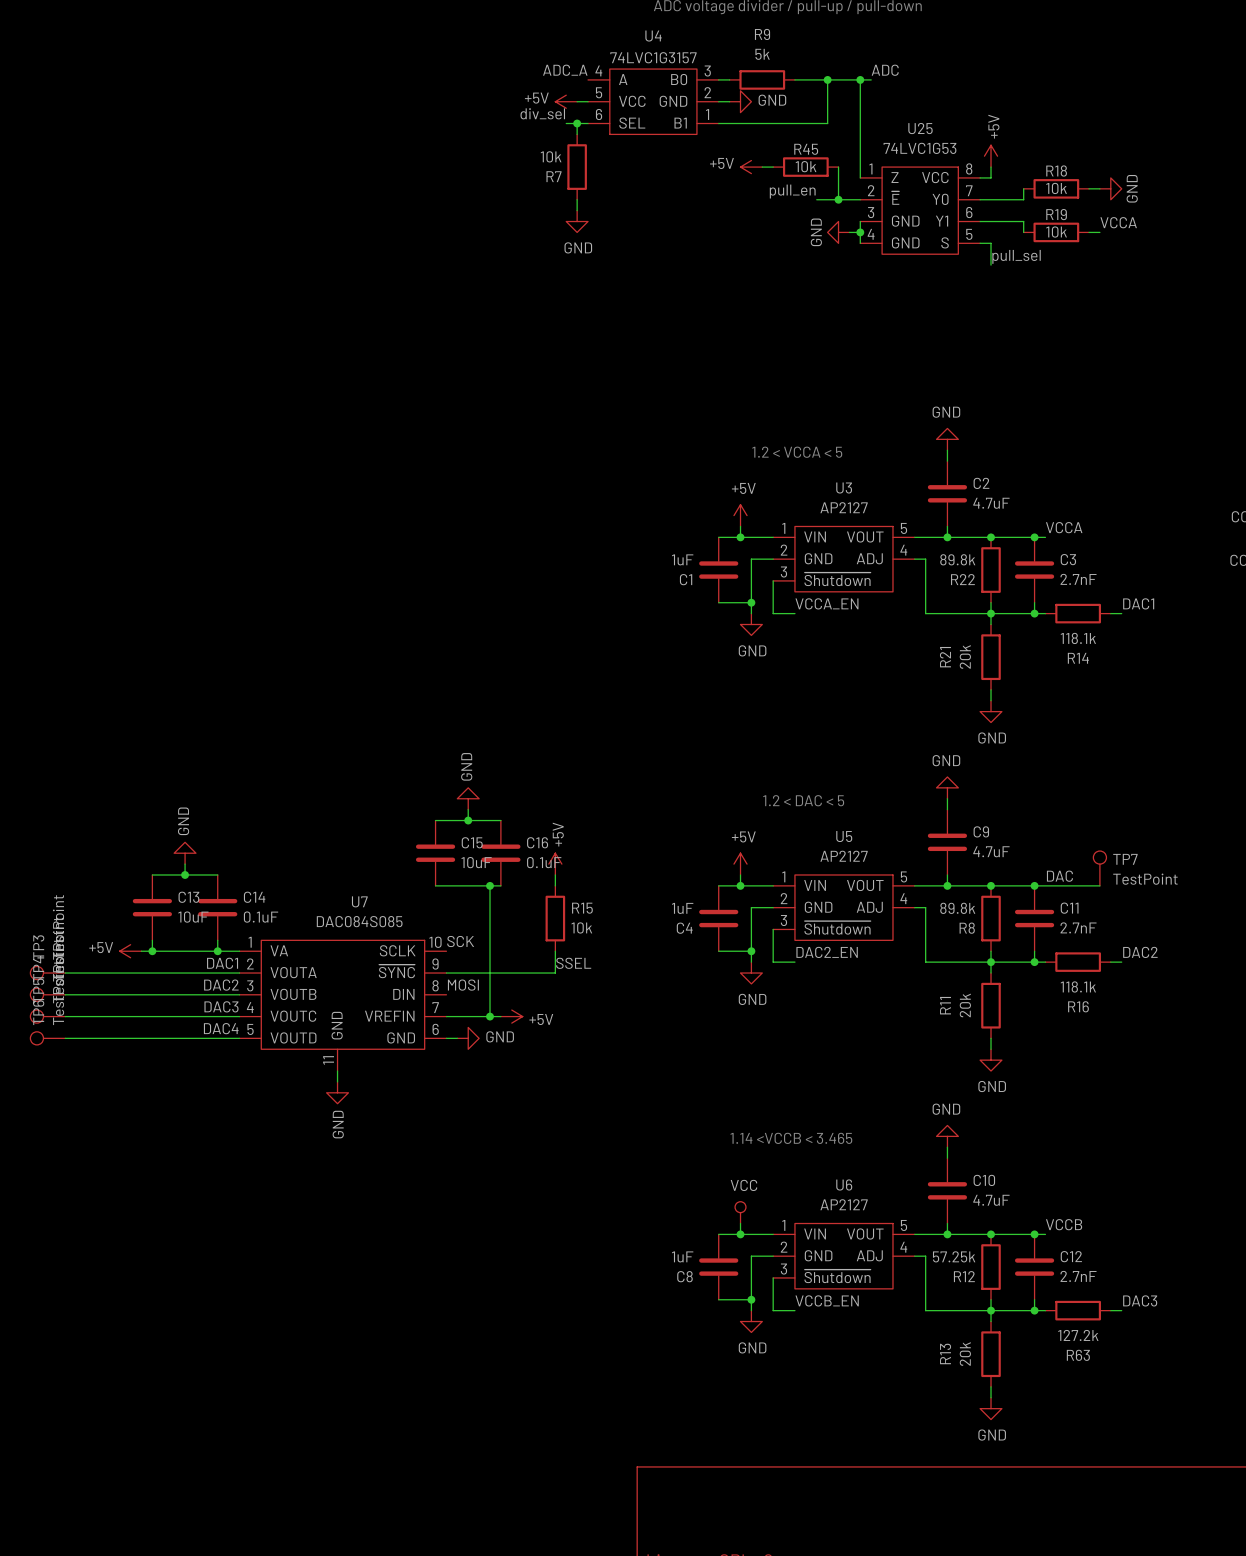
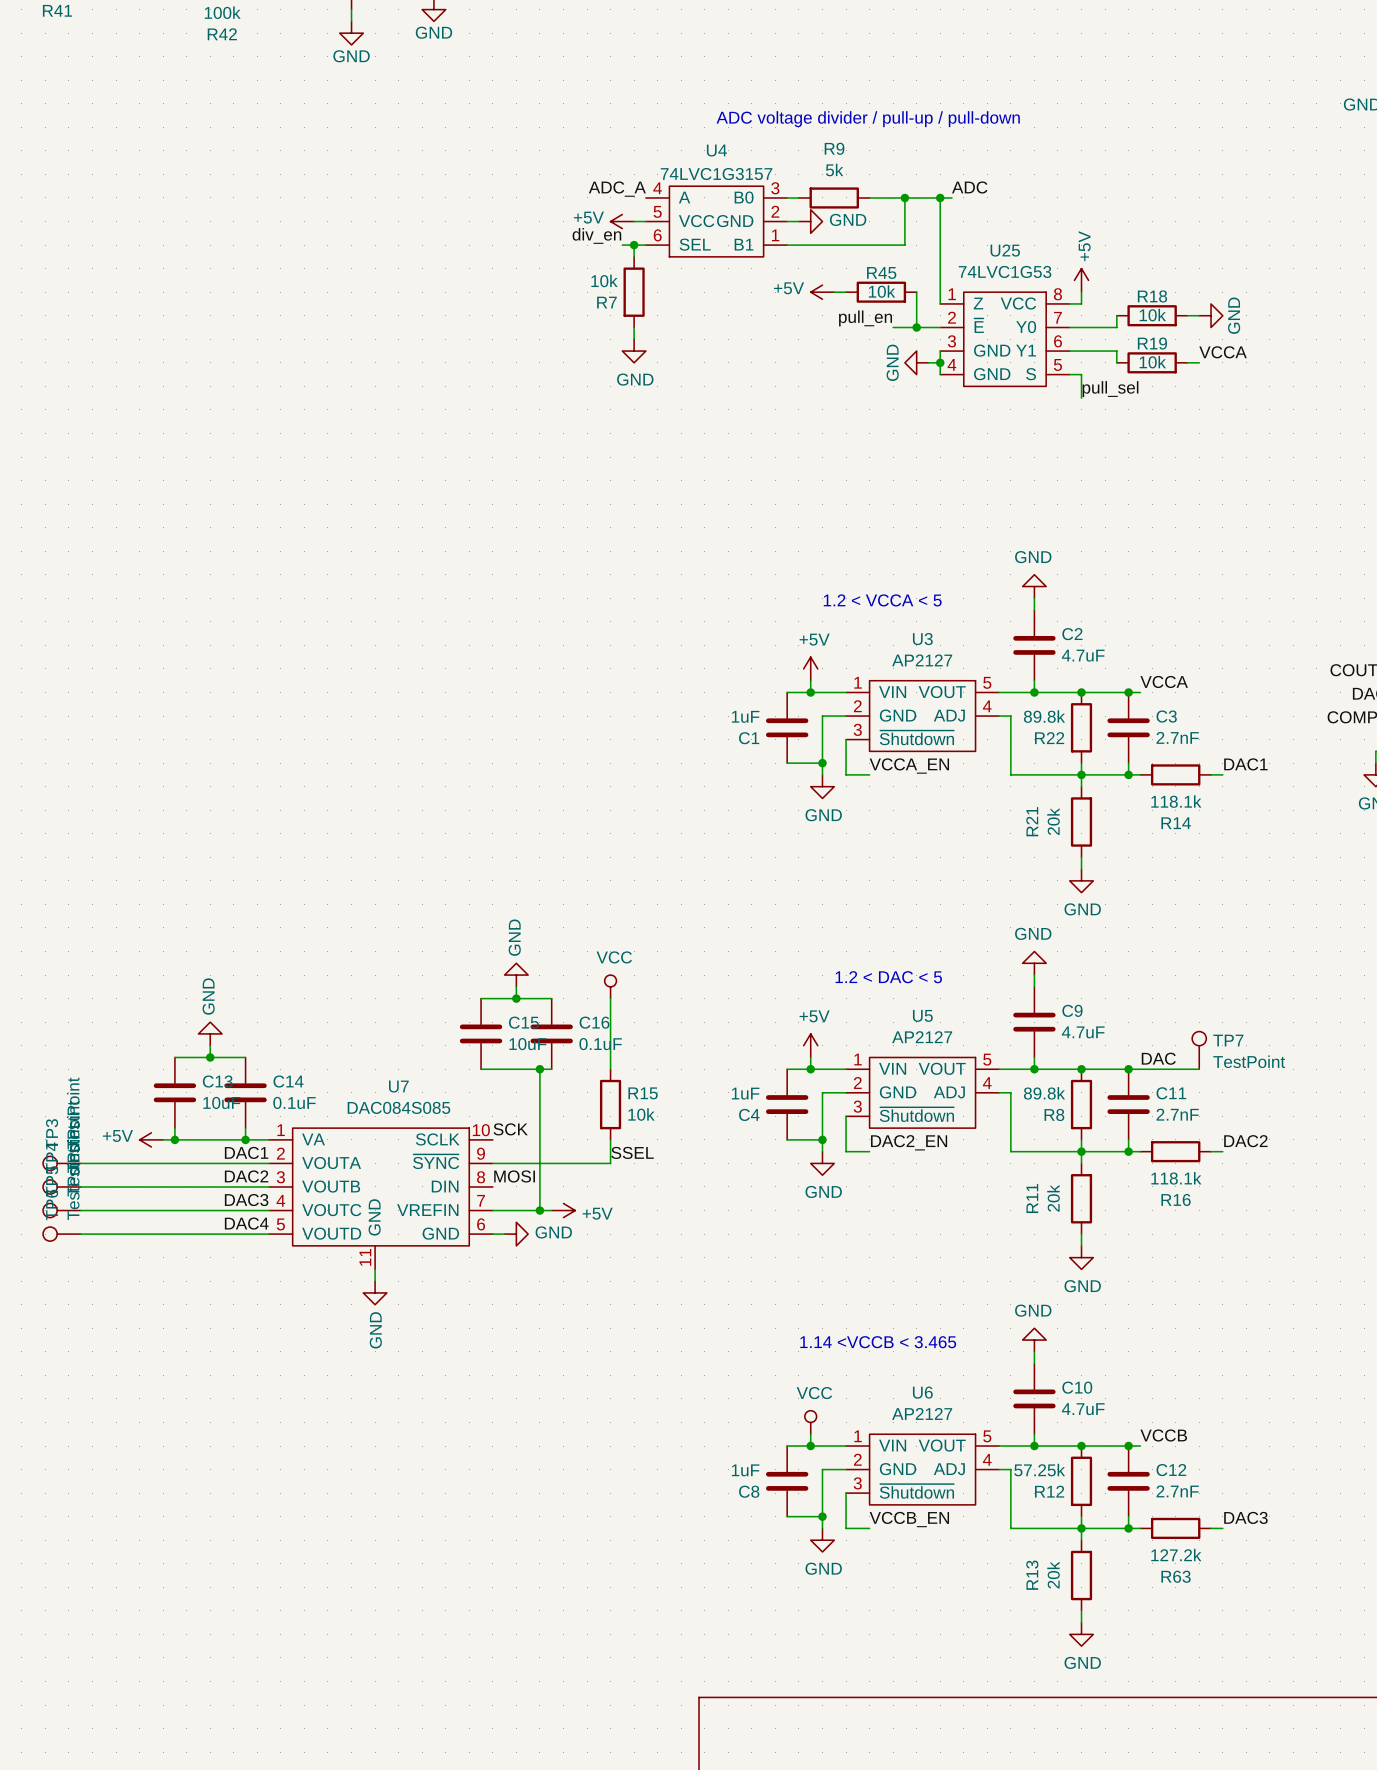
label: div_sel (542, 113) -> div_en (596, 235)
power symbol: none -> VCC (610, 986)
wire: none -> (610, 998) (610, 1057)
power symbol: +5V (555, 864) -> none

